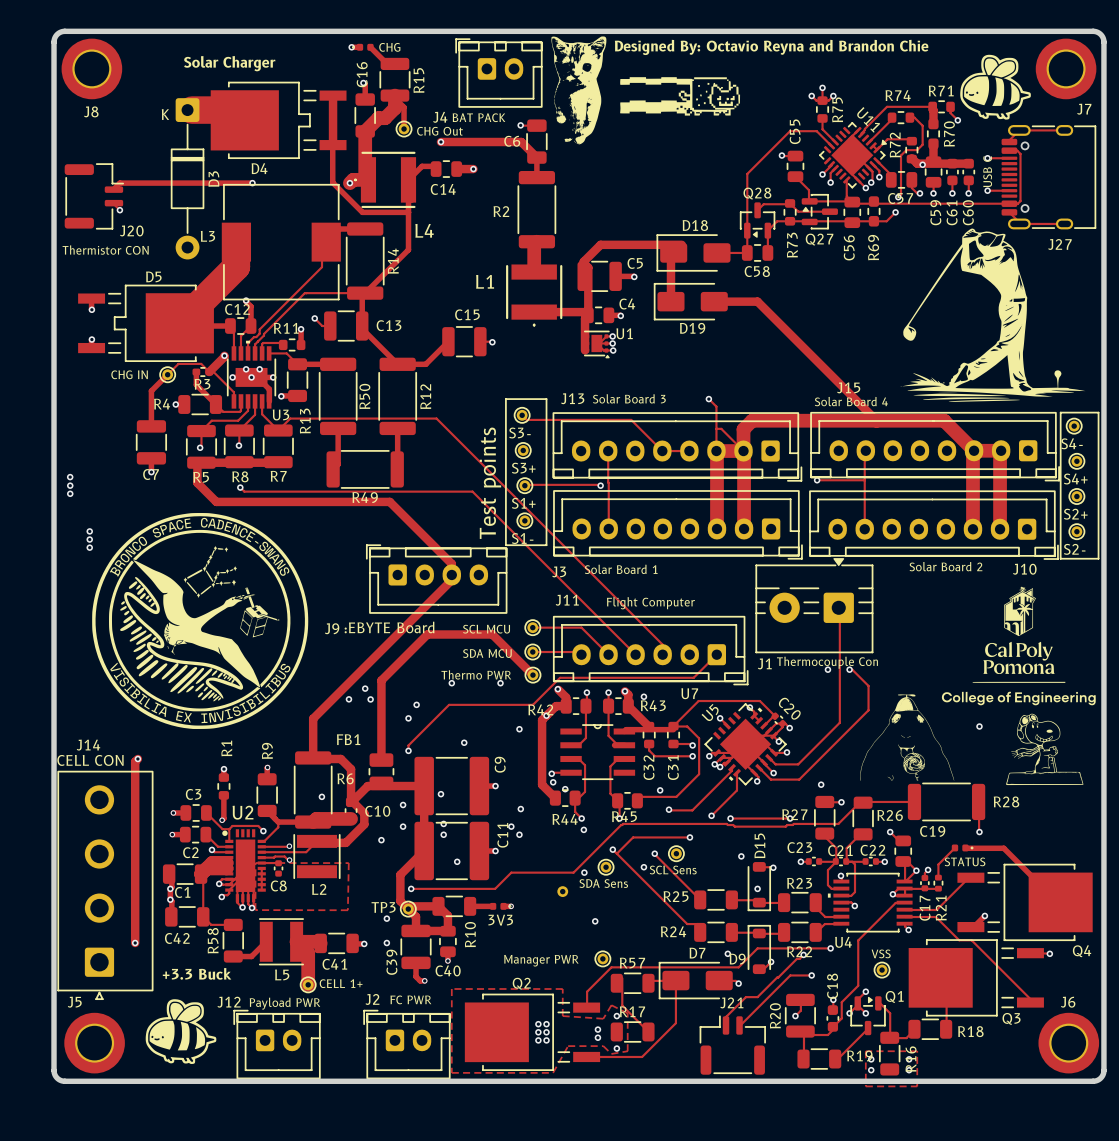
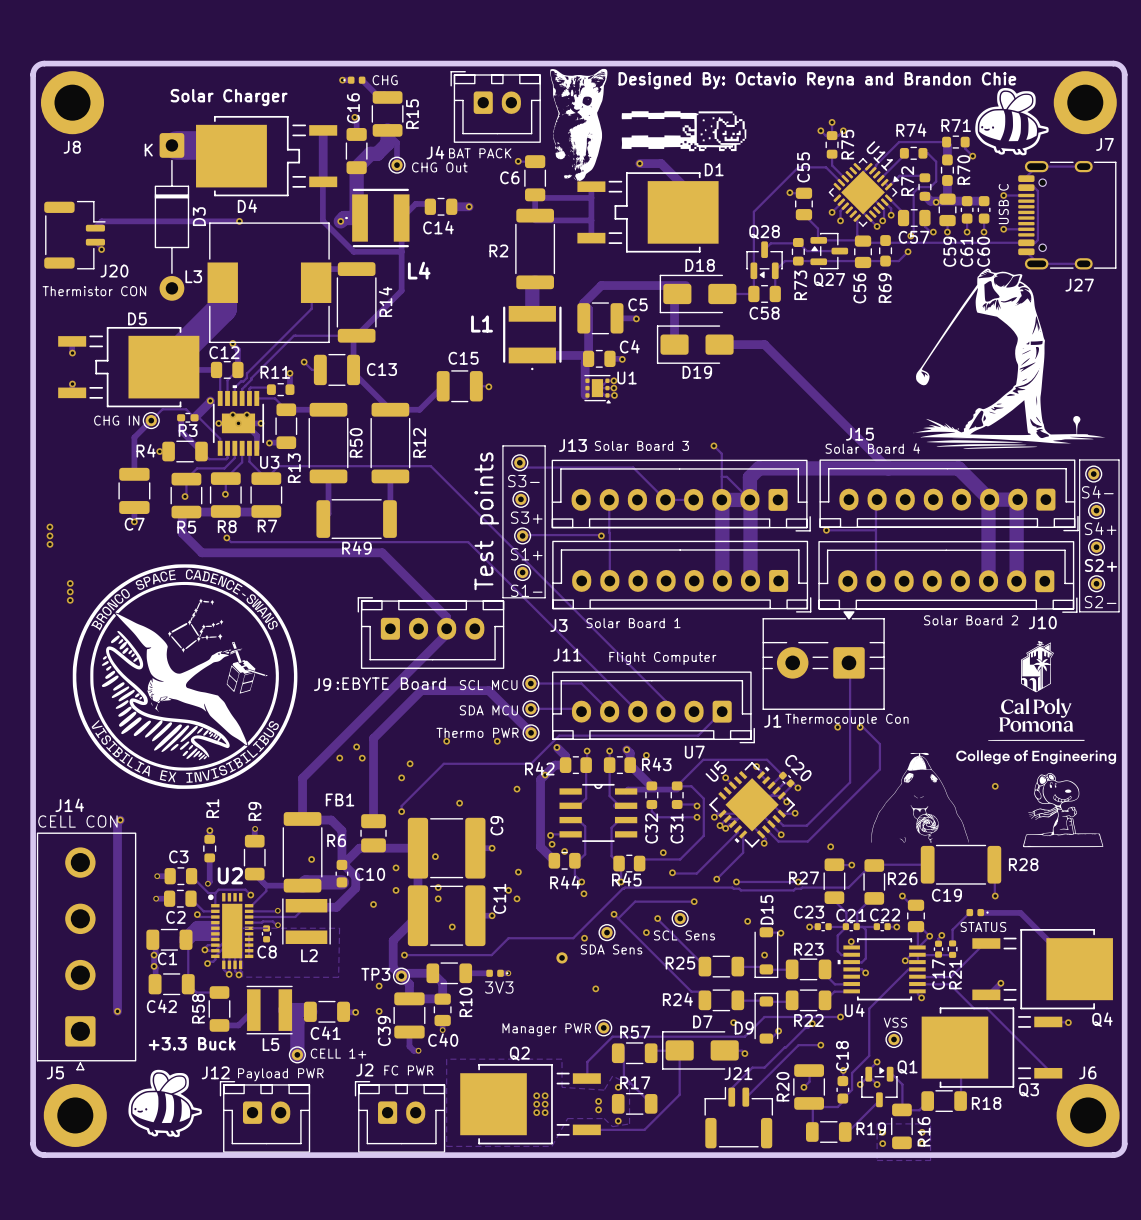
track: none -> (639, 163) (661, 163) (683, 185) (683, 212)
via: none -> (639, 163)
track: (440, 142) (521, 142) (536, 157) -> none
via: (440, 142) -> none
track: none -> (591, 186) (591, 238)
track: none -> (532, 197) (591, 197)
D1: none -> (648, 212)
track: none -> (535, 220) (591, 220)

